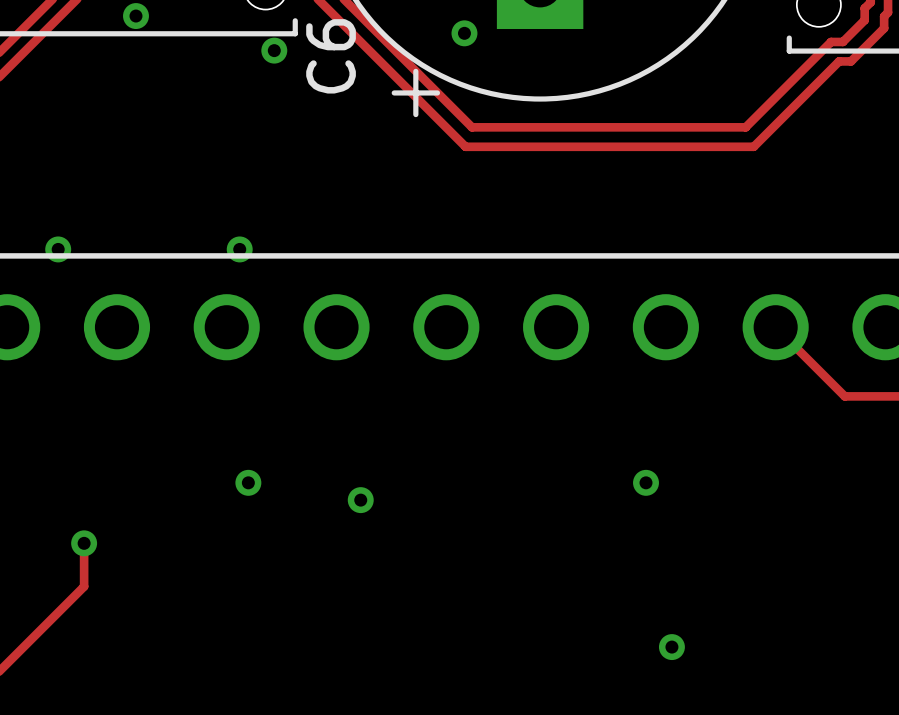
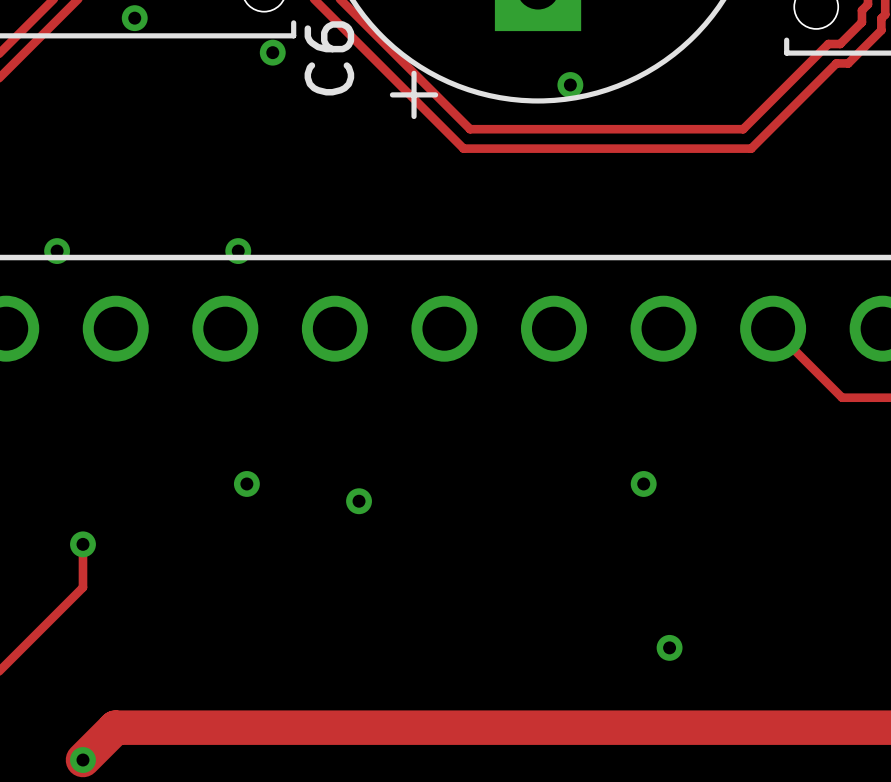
via: (464, 33) -> none
via: none -> (570, 85)

